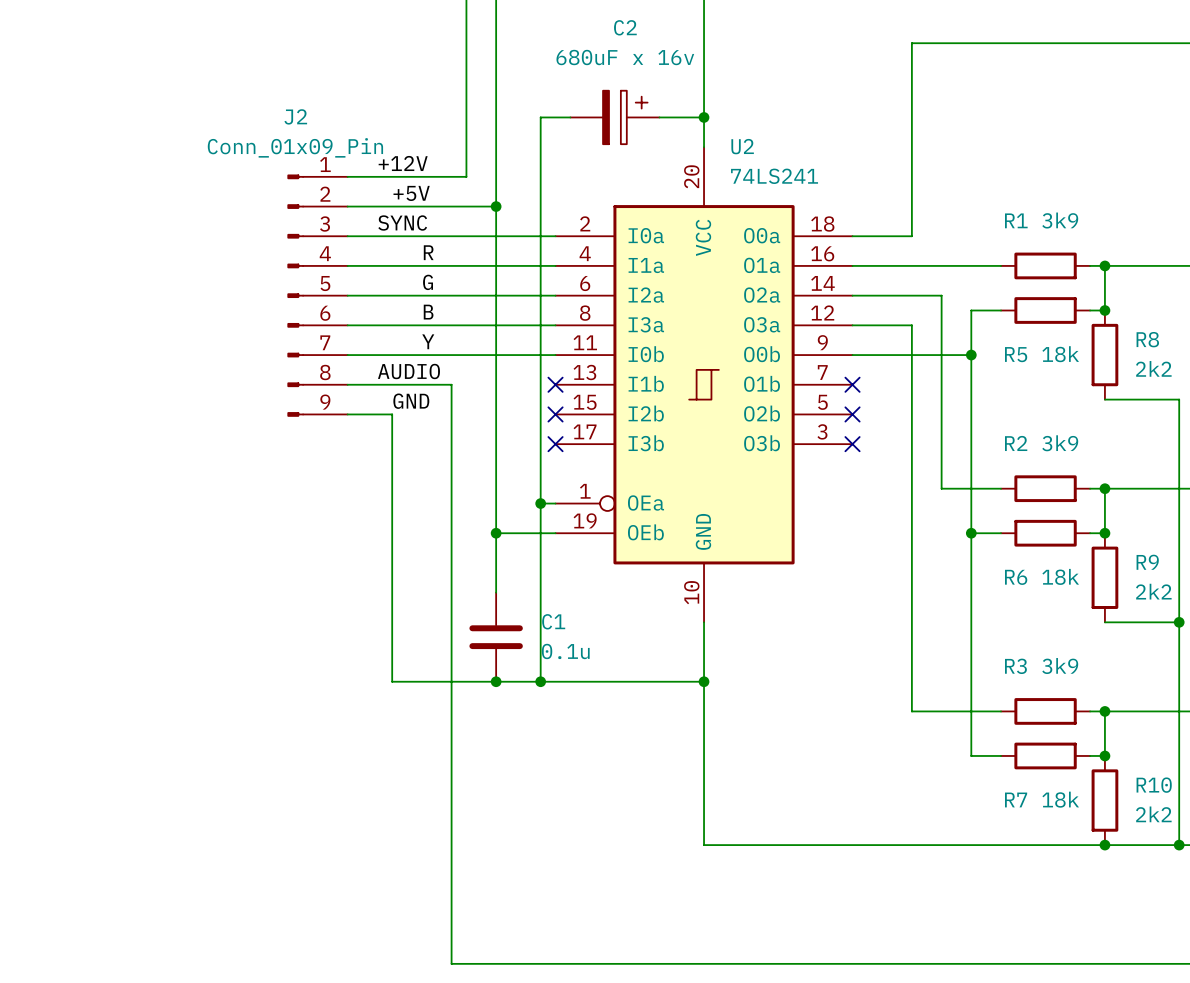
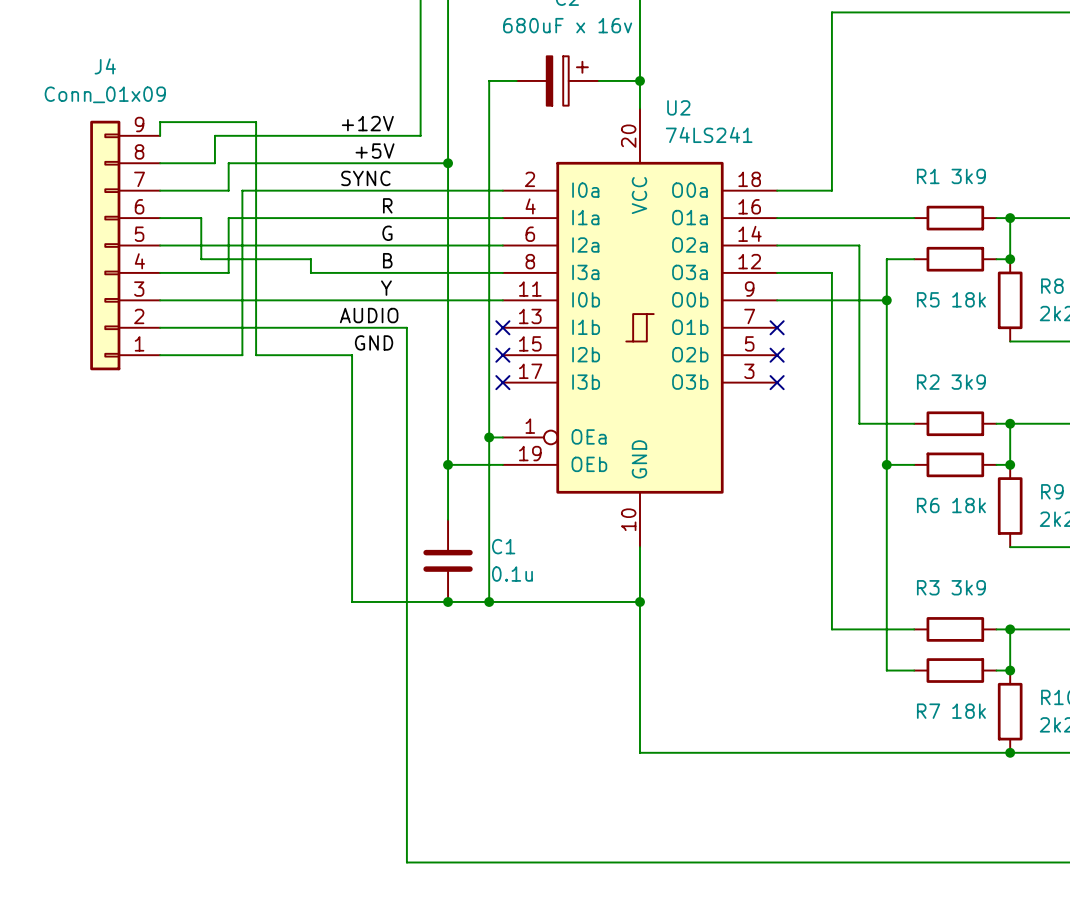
wire: none -> (160, 135) (160, 122) (256, 122) (256, 355) (310, 355)
wire: none -> (310, 135) (214, 135) (214, 163) (160, 163)
wire: none -> (310, 163) (228, 163) (228, 190) (160, 190)
wire: none -> (310, 190) (242, 190) (242, 355) (160, 355)
wire: none -> (160, 218) (201, 218) (201, 259) (310, 259) (310, 272)
wire: none -> (310, 218) (228, 218) (228, 272) (160, 272)
J4: none -> Conn_01x09 (125, 245)
wire: none -> (160, 245) (310, 245)
J2: Conn_01x09_Pin (317, 295) -> none
wire: none -> (160, 300) (310, 300)
wire: none -> (160, 327) (310, 327)

